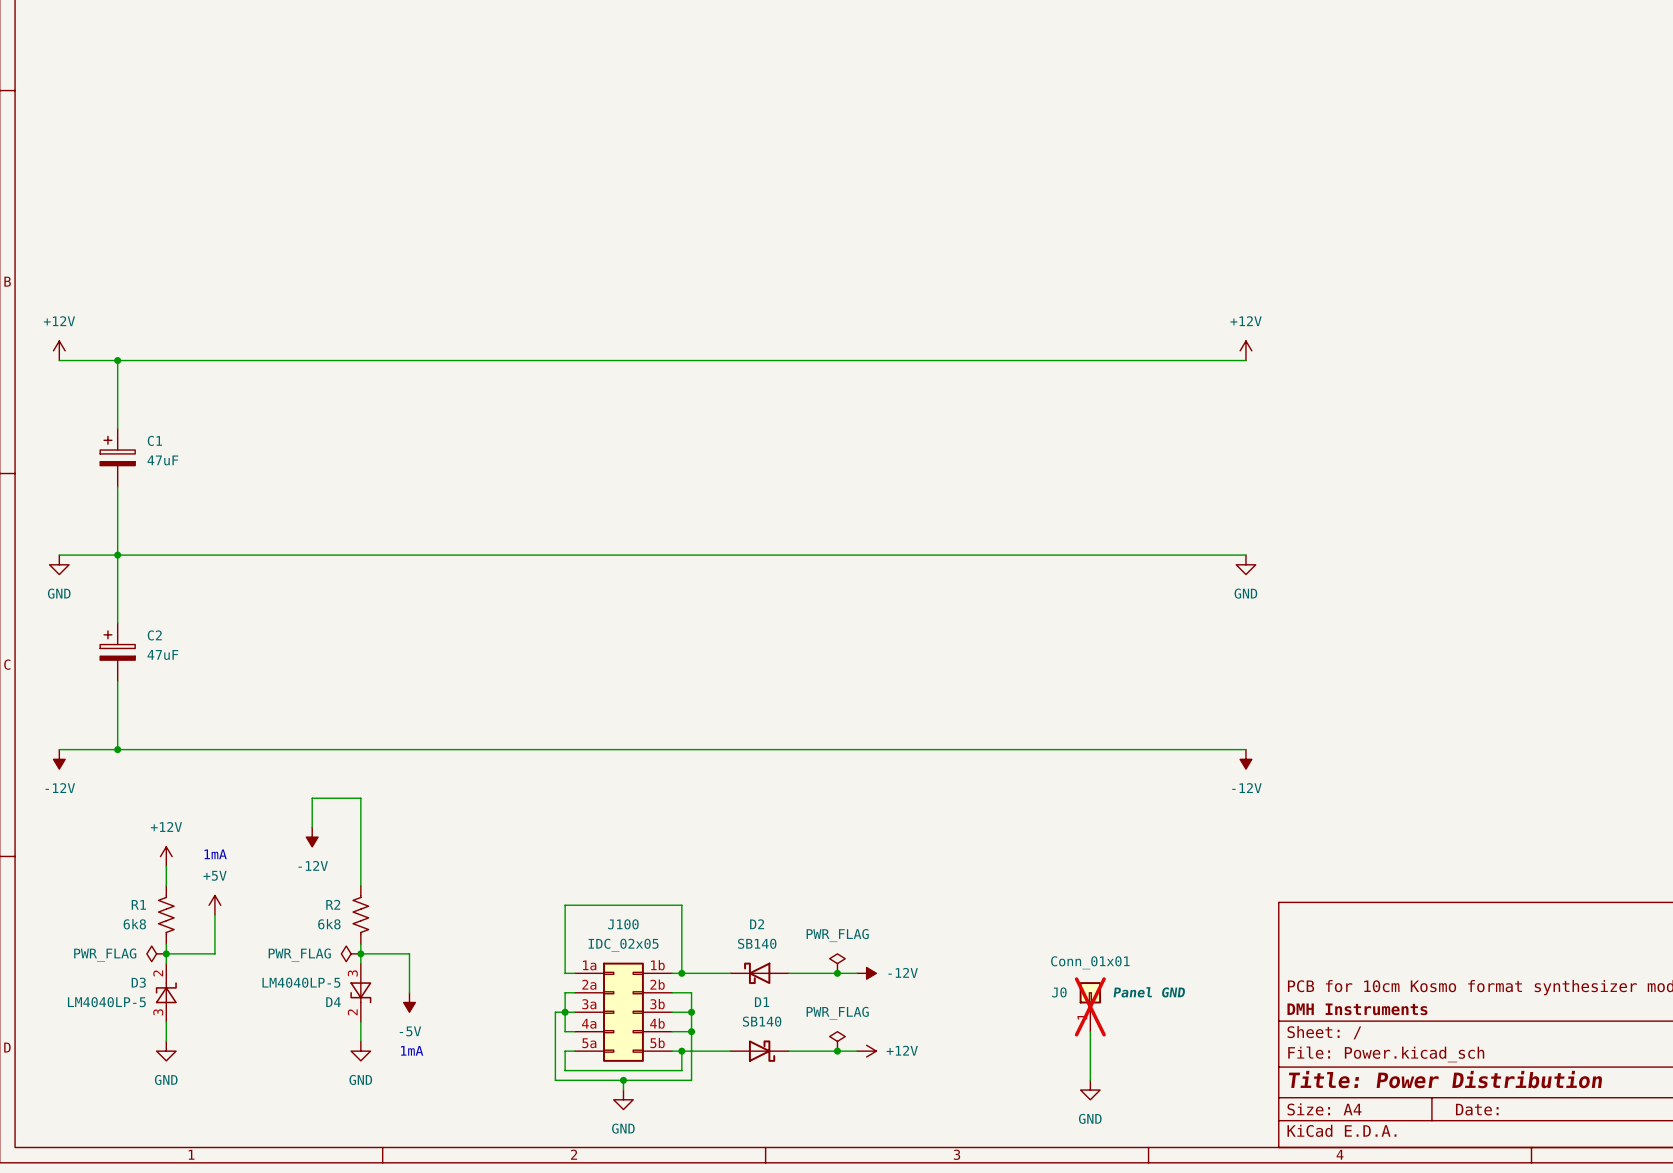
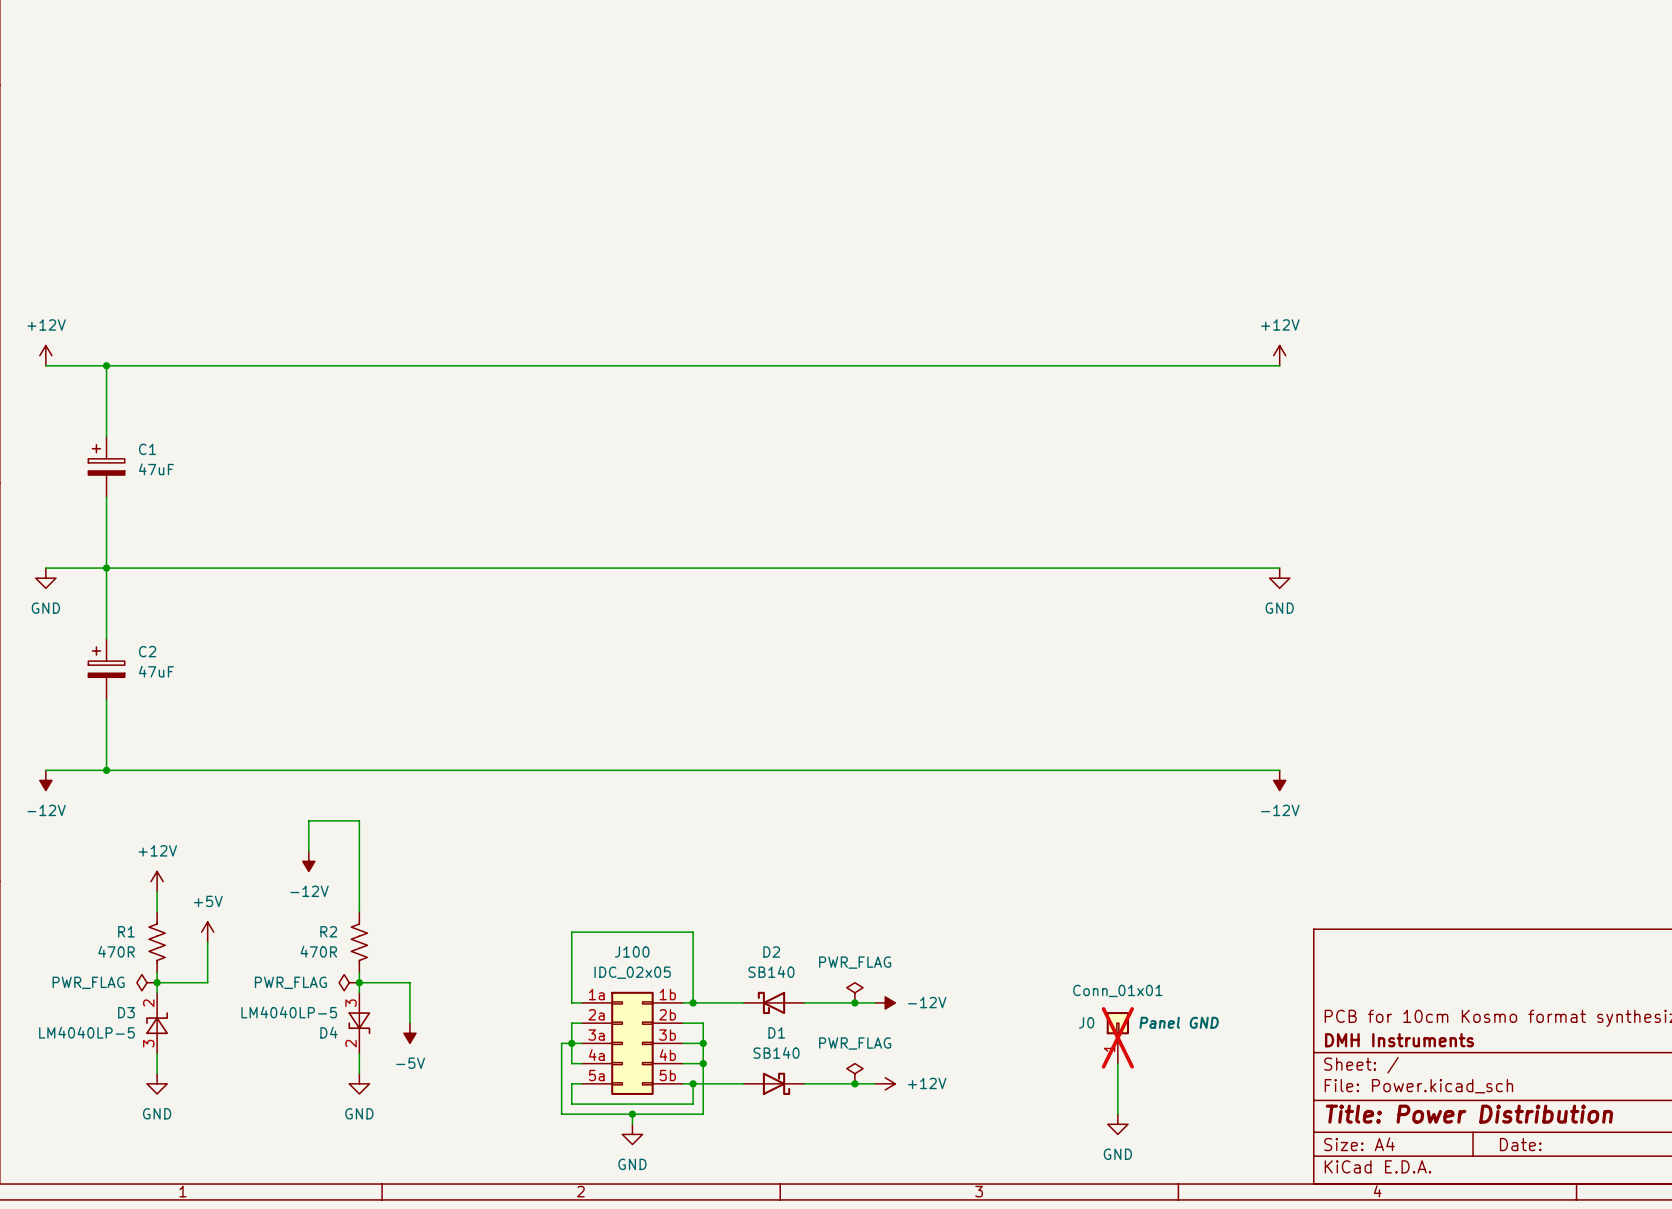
text: 1mA (215, 854) -> none
R1 value: 6k8 (134, 924) -> 470R (116, 951)
R2 value: 6k8 (329, 924) -> 470R (318, 951)
text: 1mA (412, 1050) -> none

